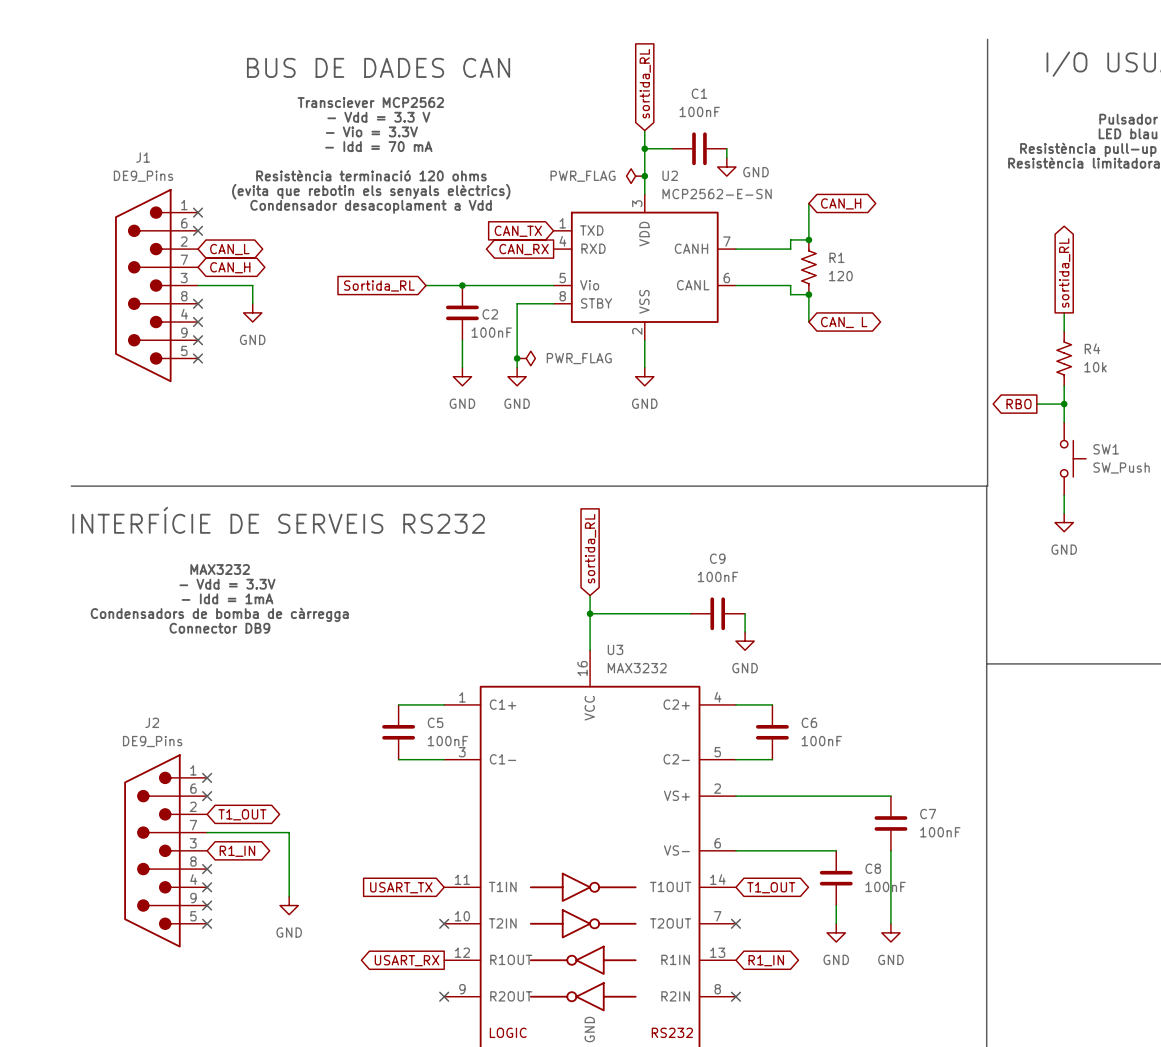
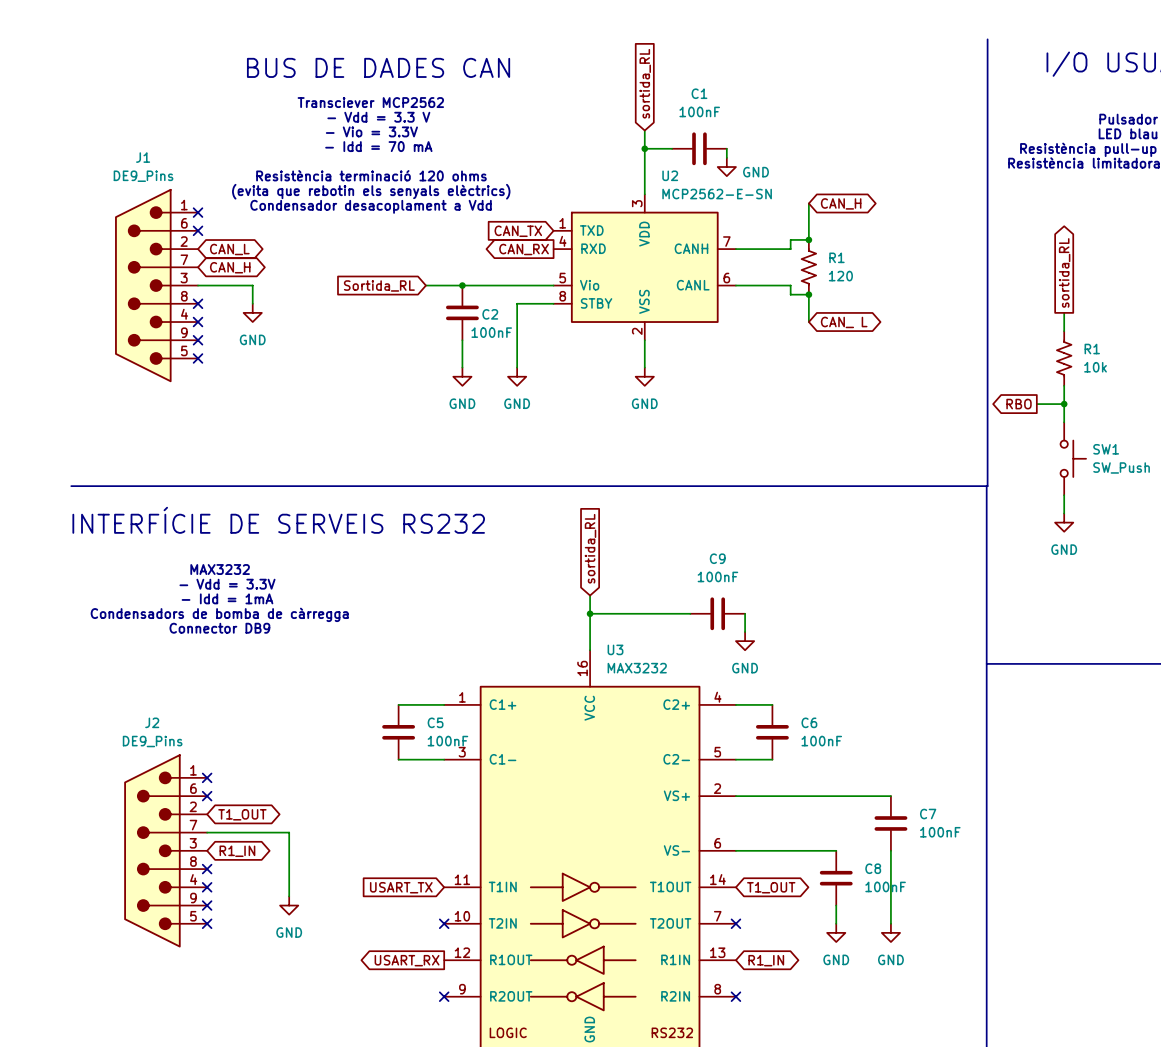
power symbol: PWR_FLAG (635, 176) -> none
junction: (644, 176) -> none
R4 name: R4 (1092, 348) -> R1 (1092, 349)
junction: (517, 358) -> none
power symbol: PWR_FLAG (526, 358) -> none

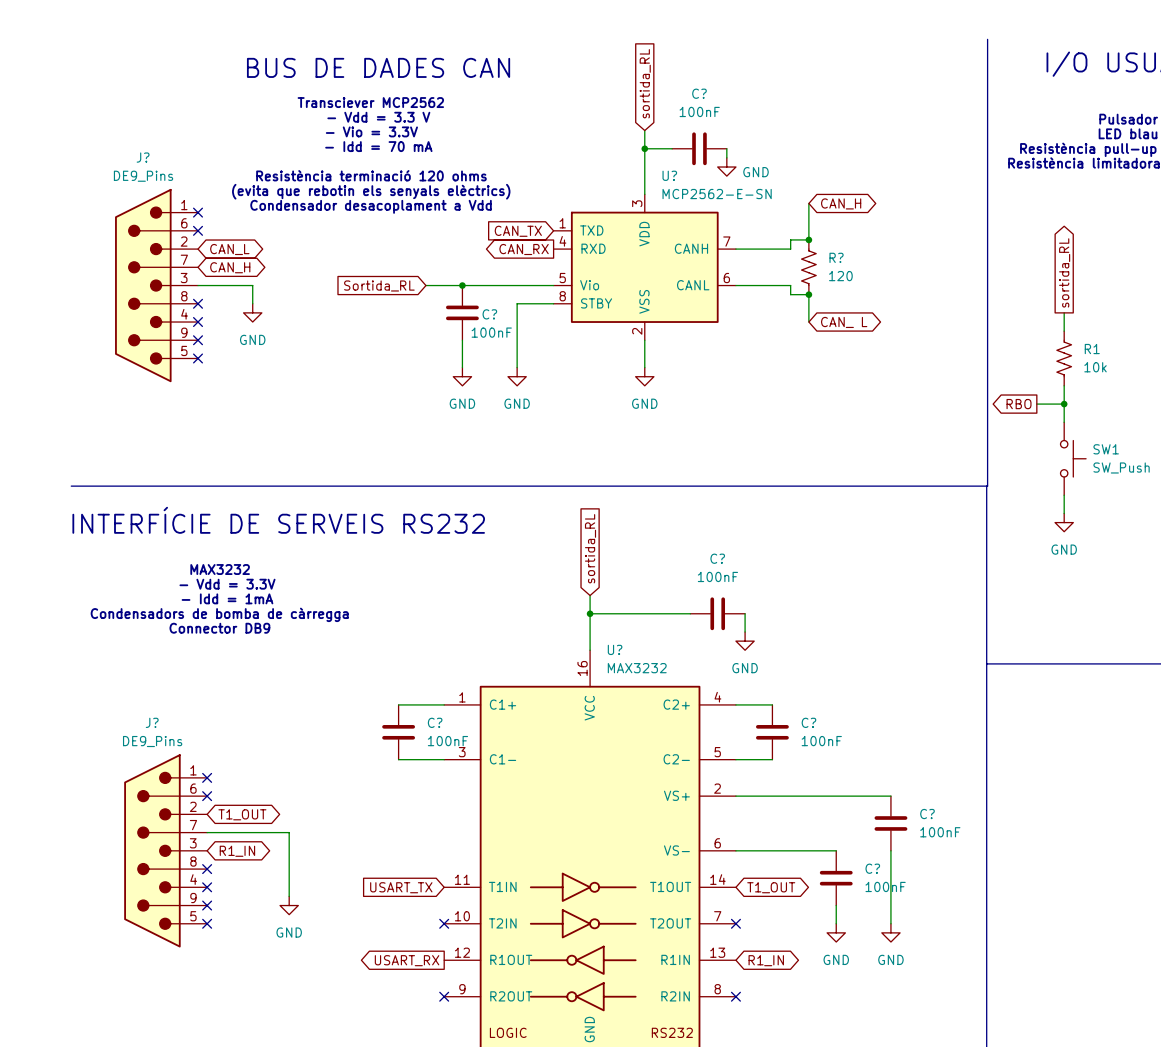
C1 name: C1 (699, 93) -> C? (699, 93)
J1 name: J1 (143, 157) -> J? (143, 157)
U2 name: U2 (670, 175) -> U? (669, 175)
R1 name: R1 (836, 257) -> R? (836, 257)
C2 name: C2 (490, 314) -> C? (489, 314)
C9 name: C9 (717, 558) -> C? (717, 558)
U3 name: U3 (615, 649) -> U? (615, 649)
J2 name: J2 (152, 722) -> J? (152, 722)
C5 name: C5 (435, 722) -> C? (435, 722)
C6 name: C6 (809, 722) -> C? (808, 722)
C7 name: C7 (928, 814) -> C? (927, 814)
C8 name: C8 (873, 868) -> C? (872, 868)

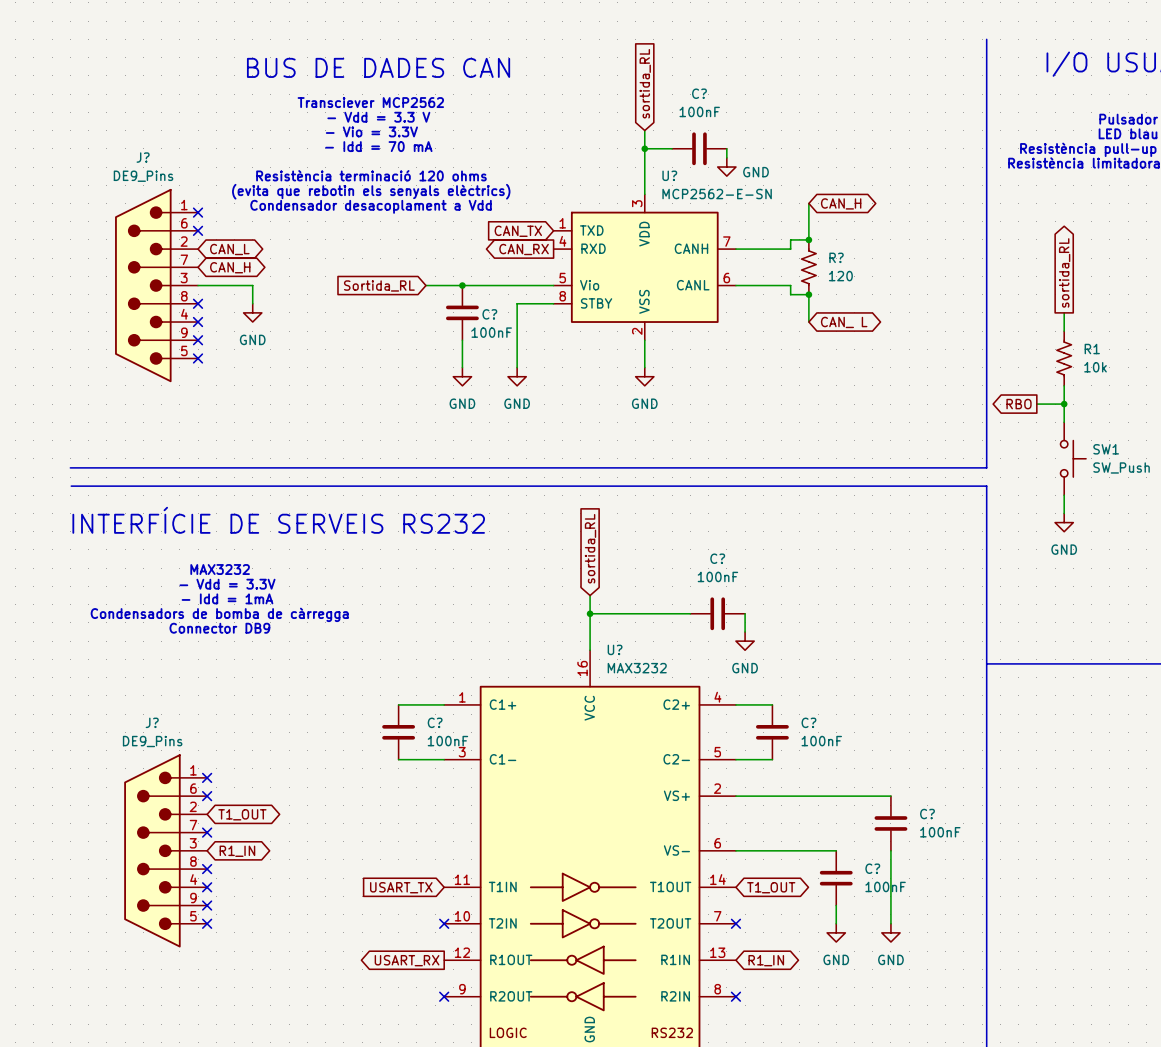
line: none -> (986, 39) (986, 467) (70, 467)
line: (987, 39) (986, 486) -> none
wire: (207, 832) (289, 832) (289, 896) -> none
no-connect mark: none -> (207, 832)
power symbol: GND (289, 905) -> none

